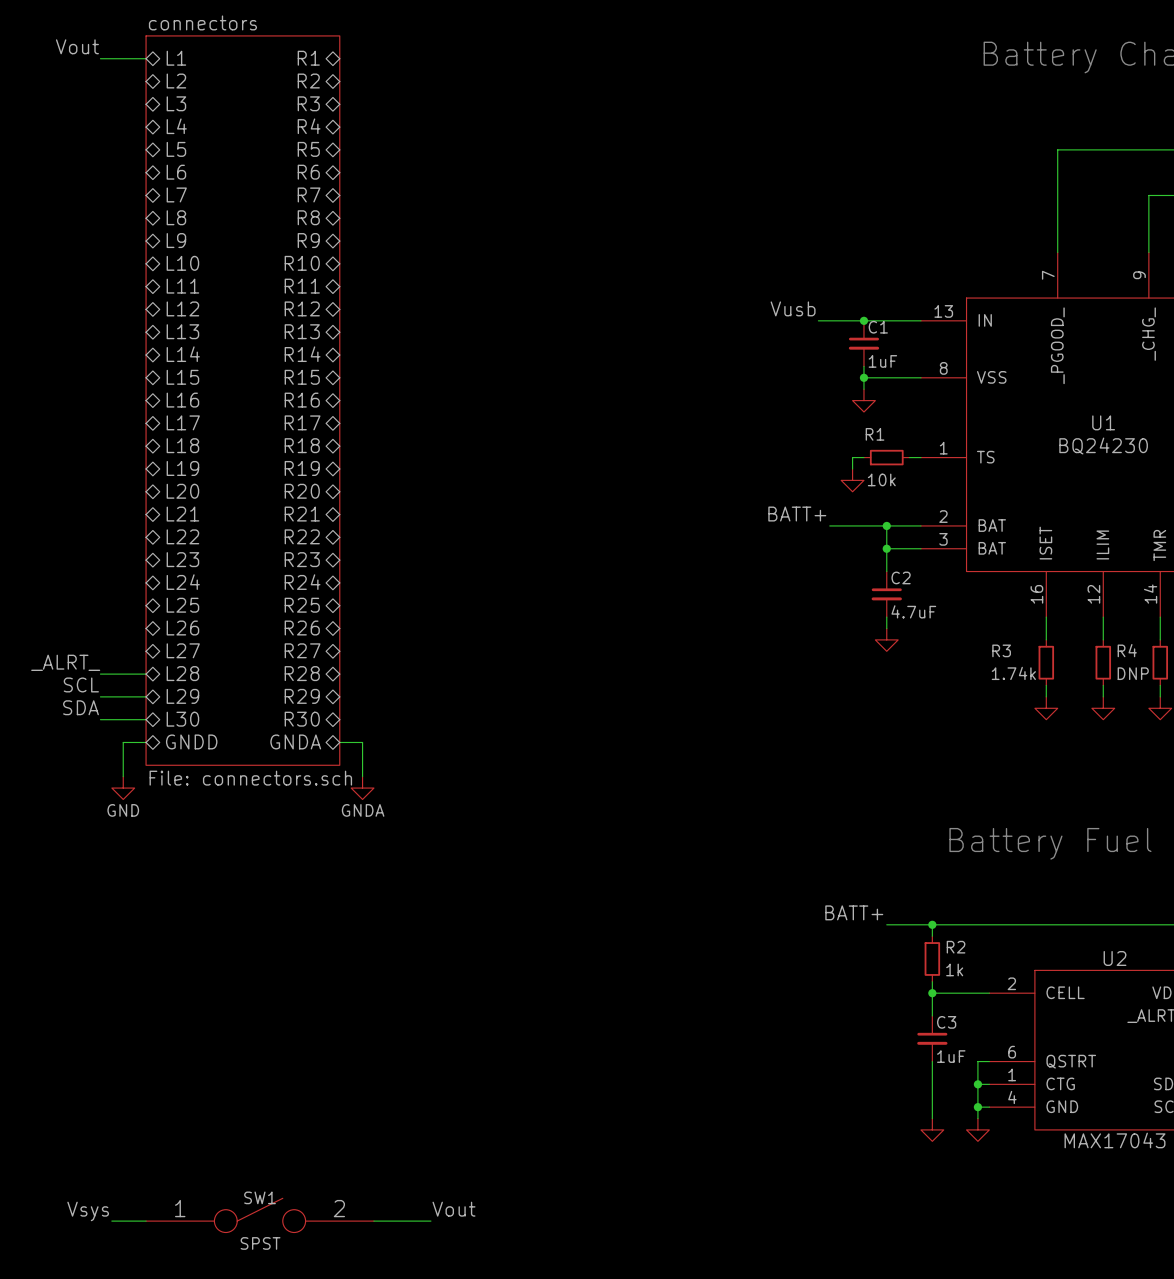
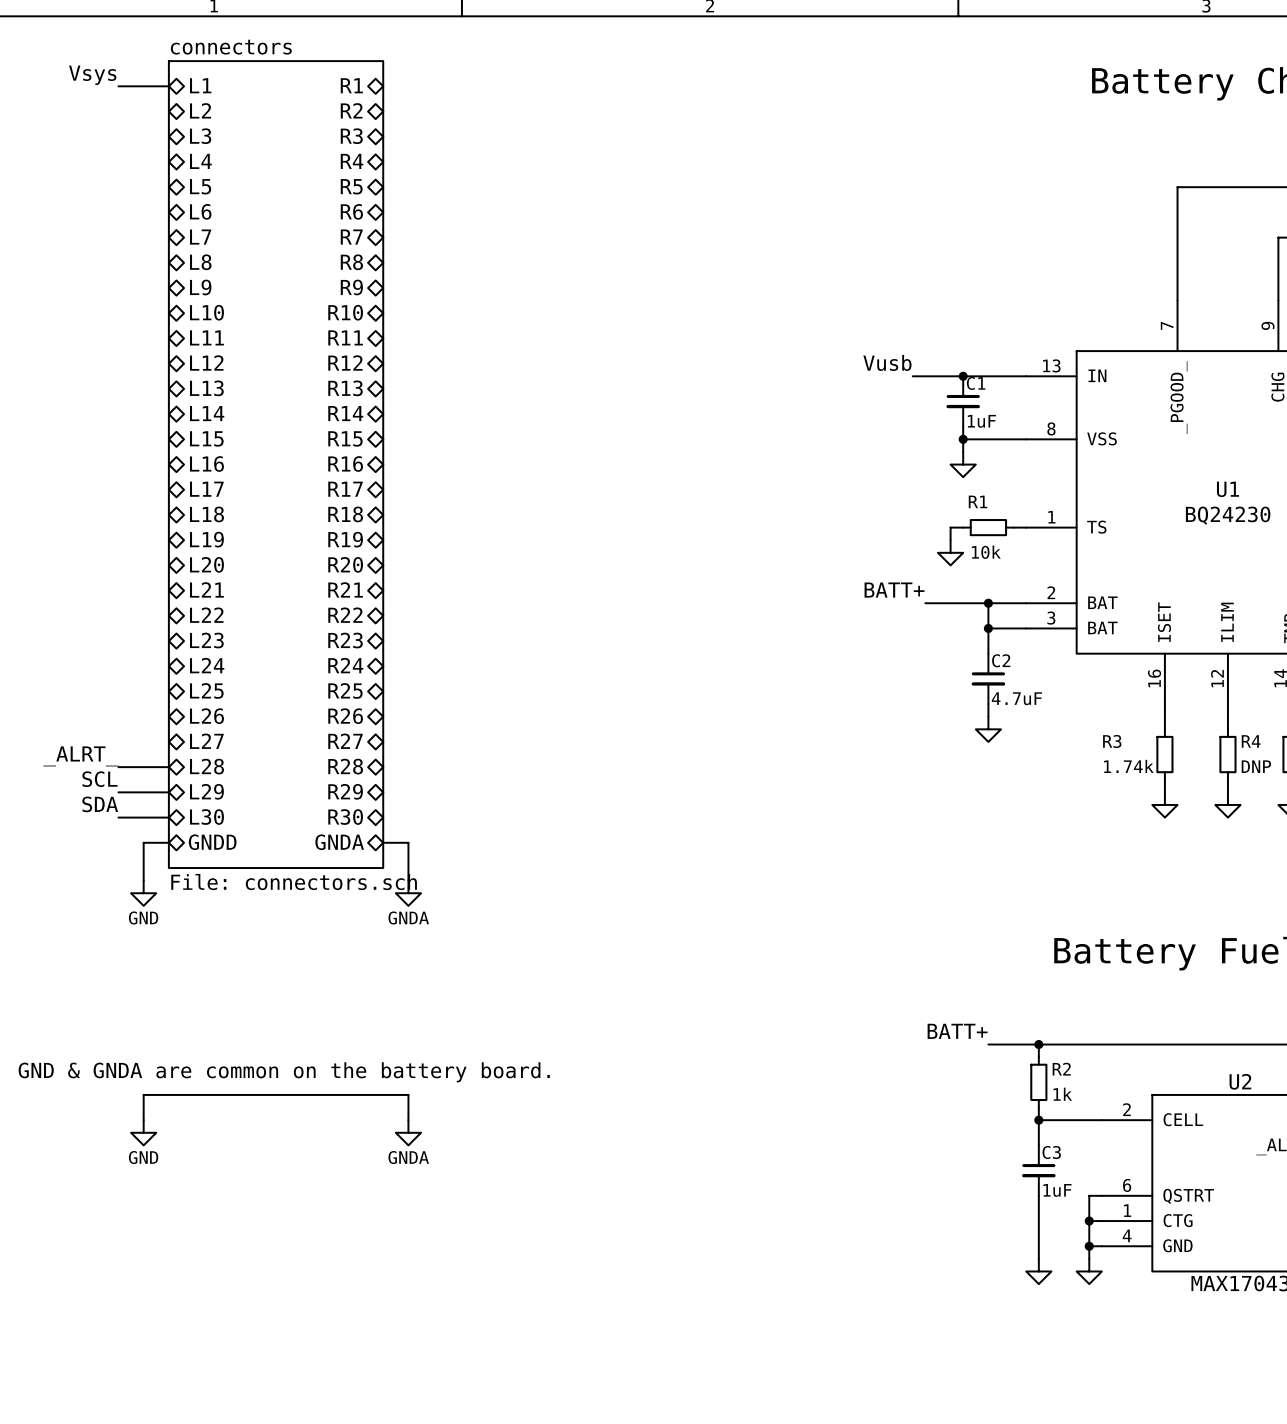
label: Vout (77, 46) -> Vsys (92, 75)
text: none -> GND & GNDA are common on the battery board. (284, 1072)
wire: none -> (143, 1120) (143, 1094) (408, 1094) (408, 1120)
power symbol: none -> GND (143, 1132)
power symbol: none -> GNDA (408, 1132)
label: Vout (453, 1209) -> none
label: Vsys (88, 1211) -> none
SW1: SPST (260, 1215) -> none
wire: (111, 1221) (146, 1221) -> none
wire: (373, 1221) (430, 1221) -> none

